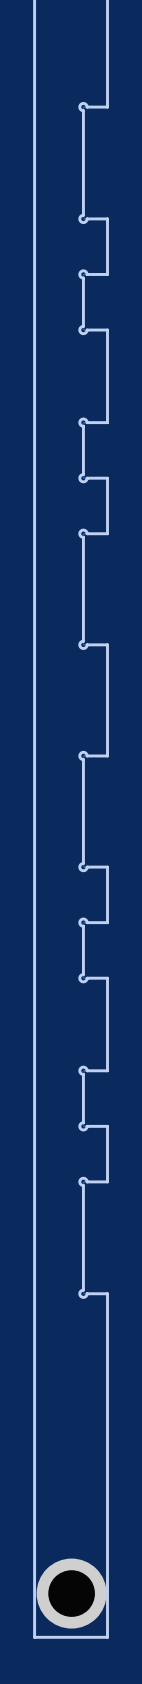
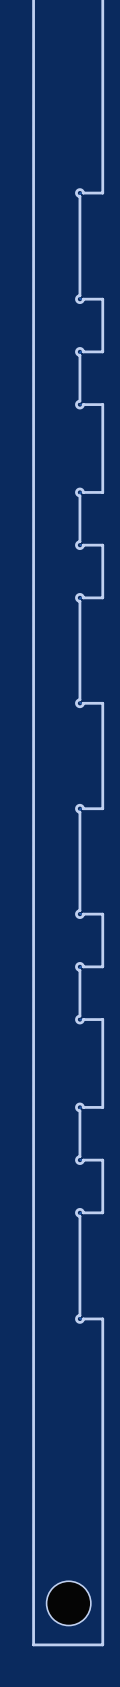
part footprint: [36, 1558, 107, 1629] -> [46, 1581, 91, 1626]

